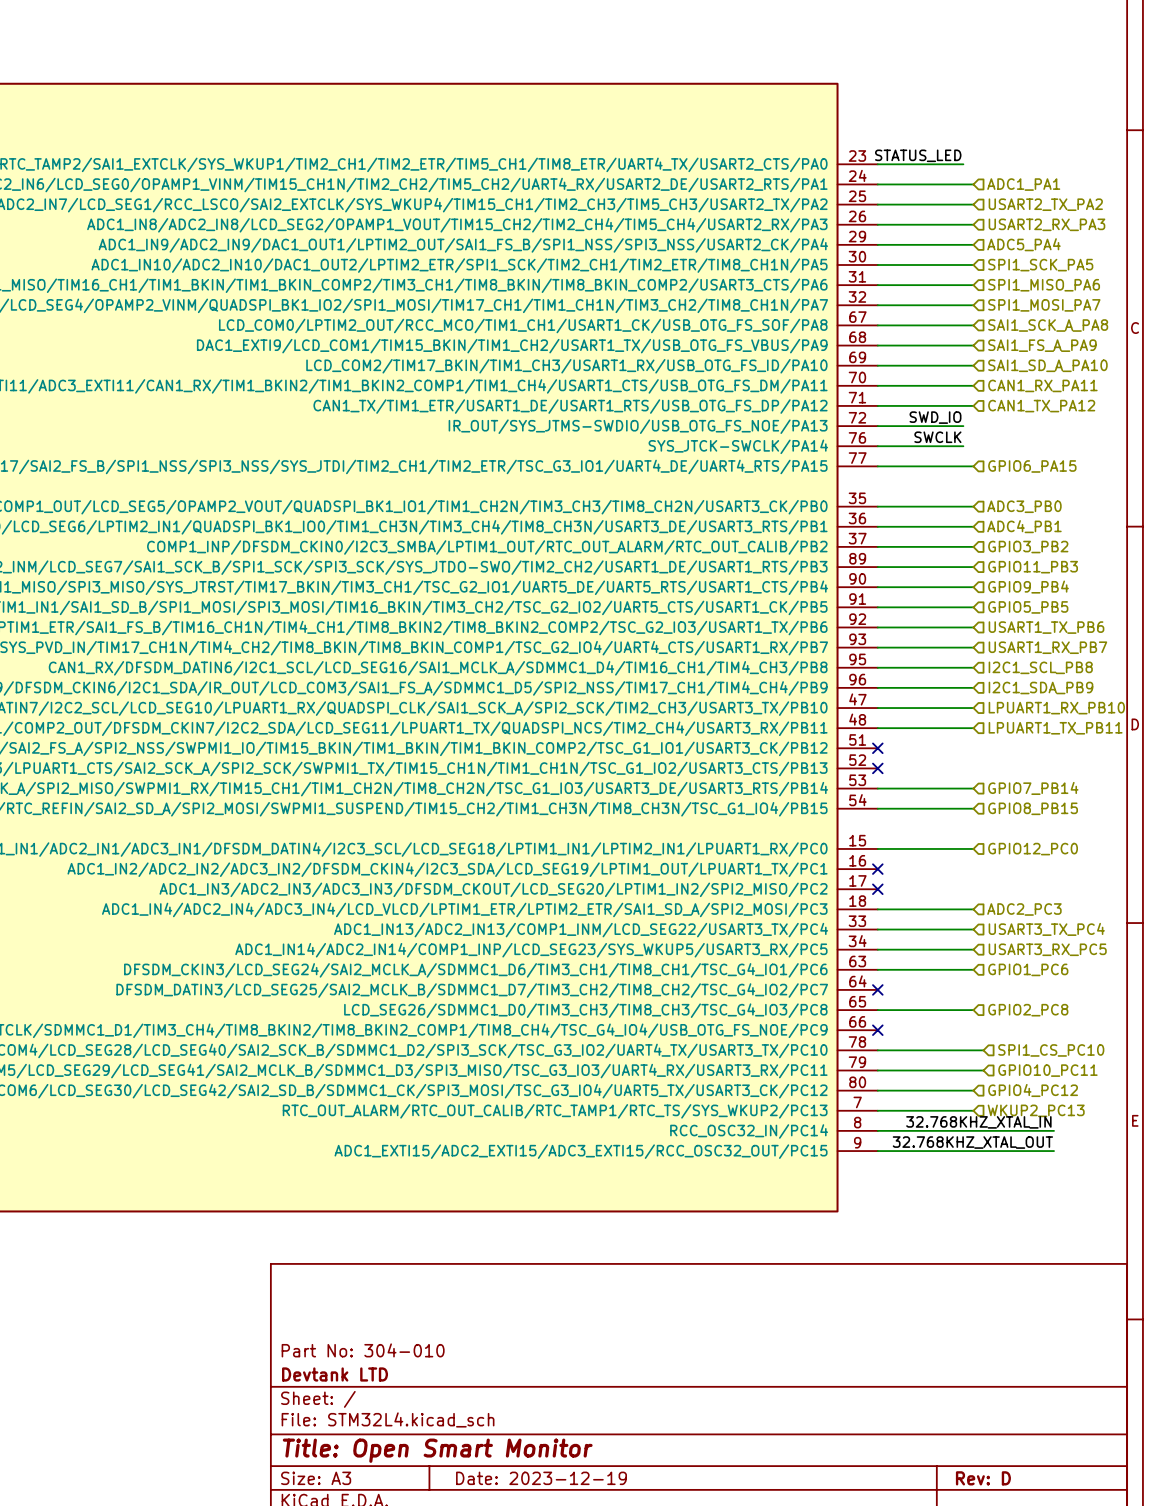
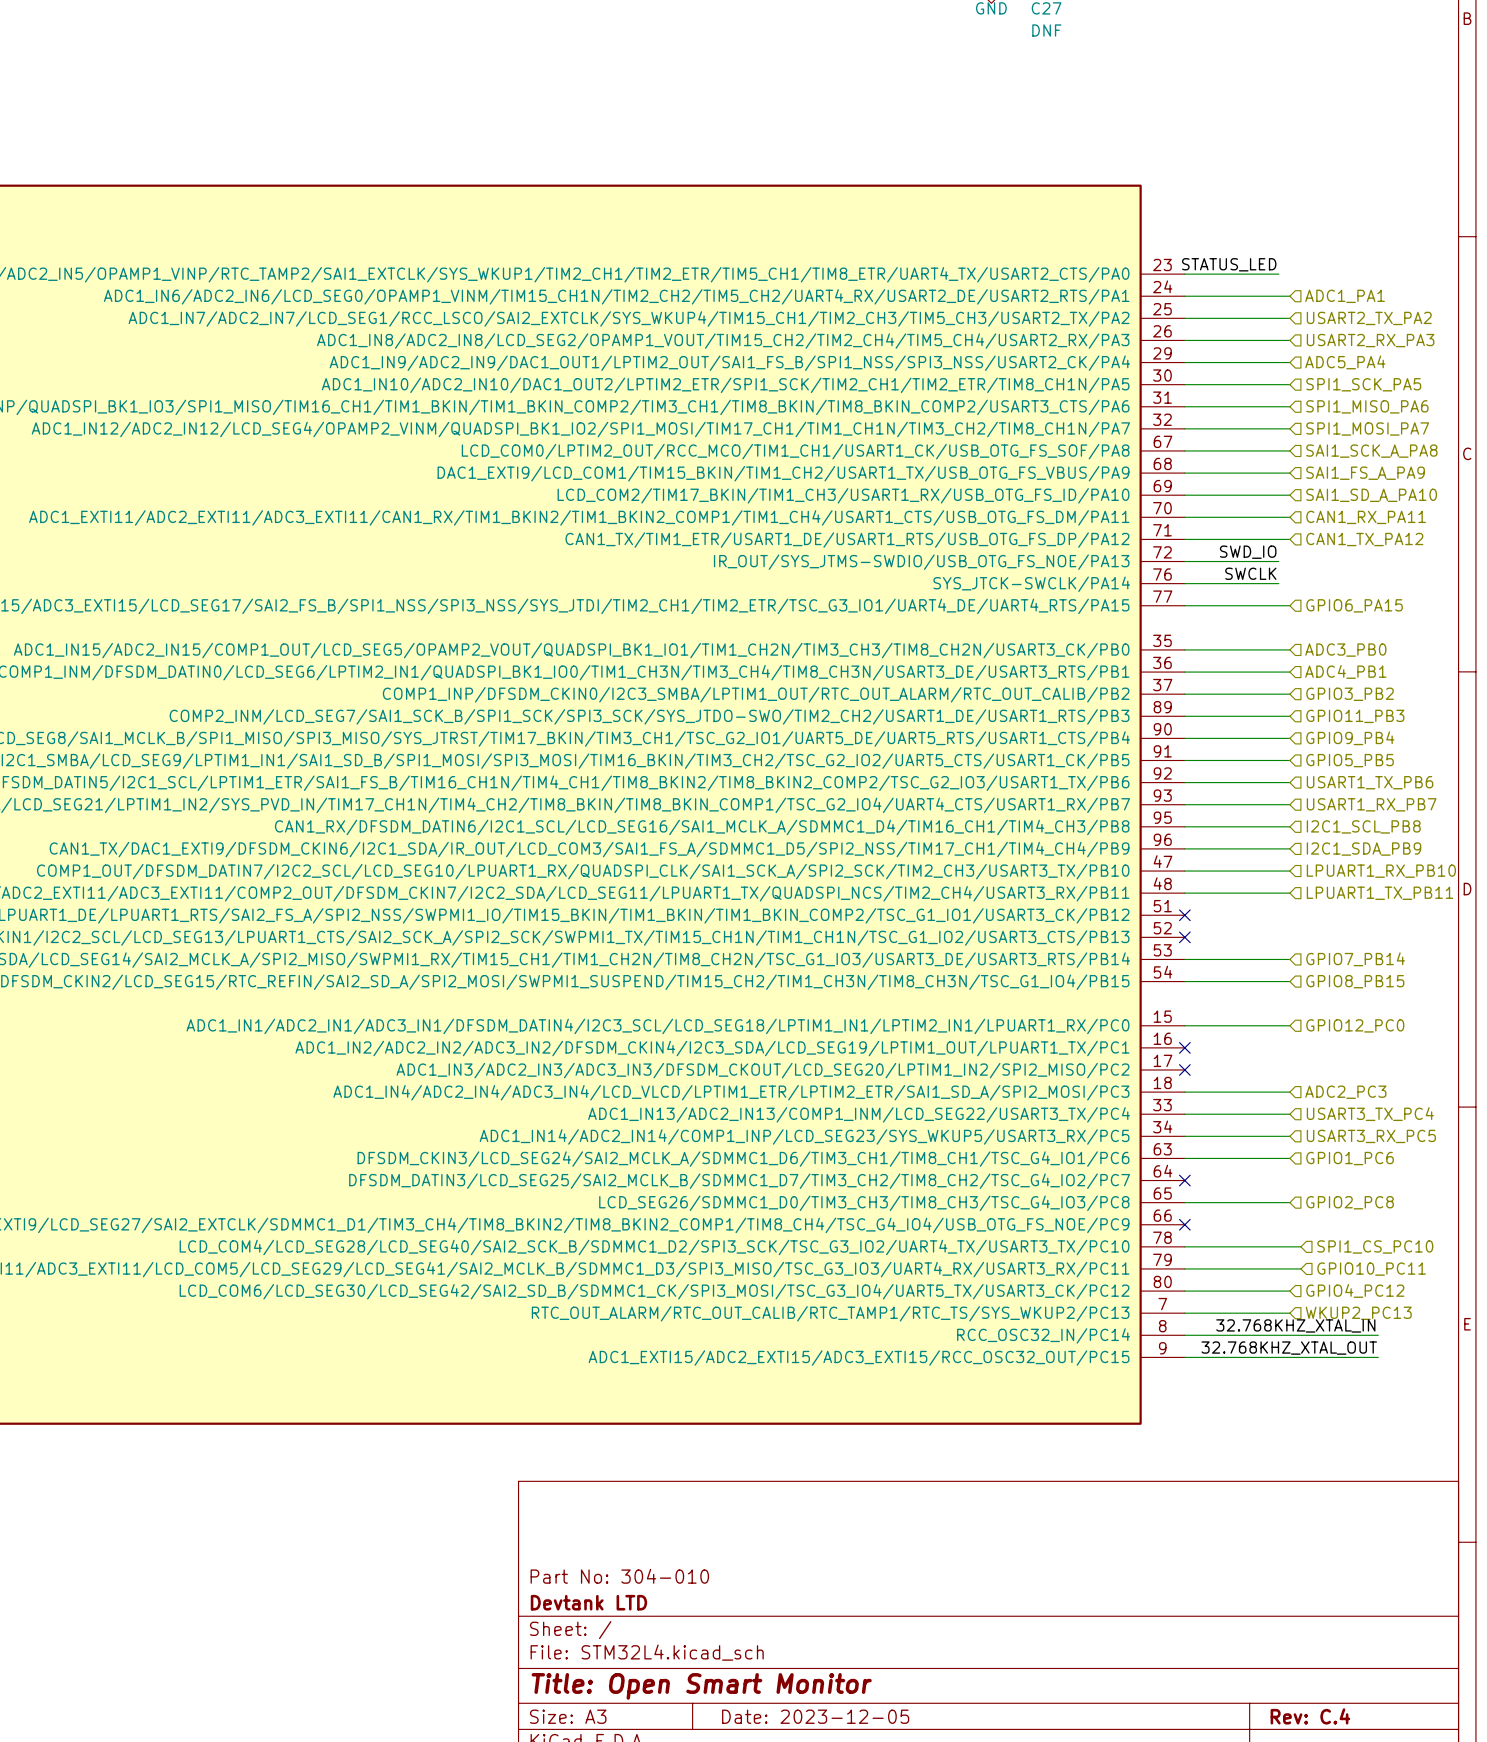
title block: Date: 2023-12-19 (541, 1478) -> Date: 2023-12-05 (815, 1716)
title block: Rev: D (983, 1478) -> Rev: C.4 (1310, 1716)

